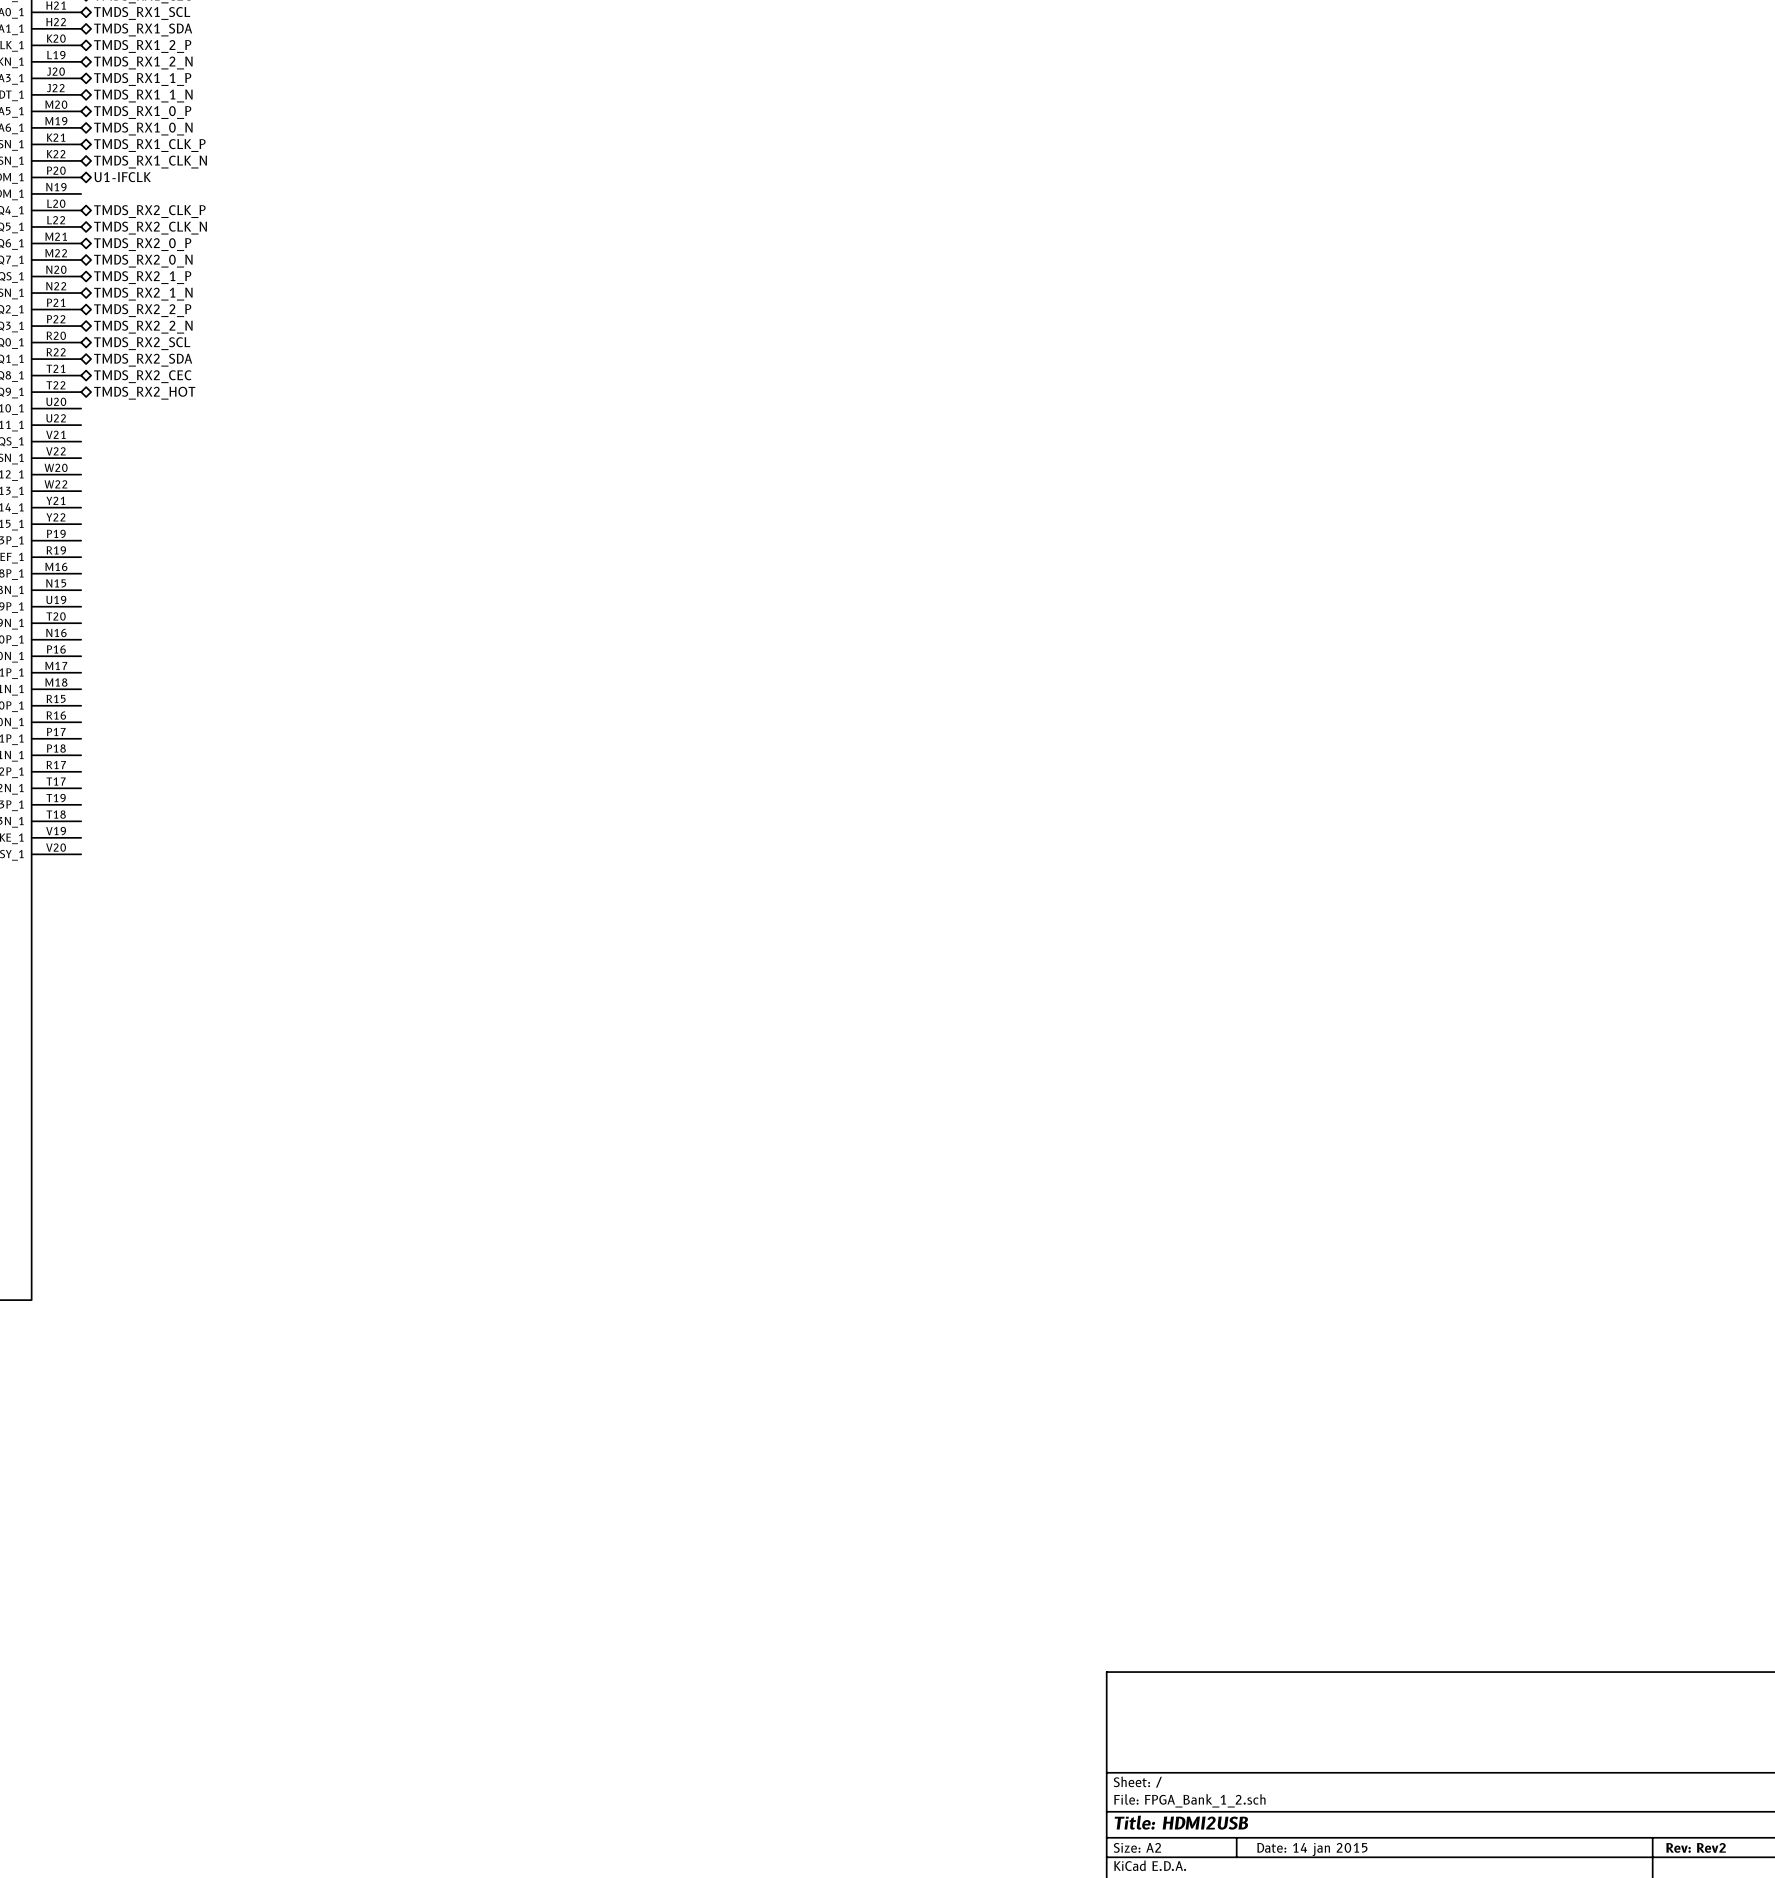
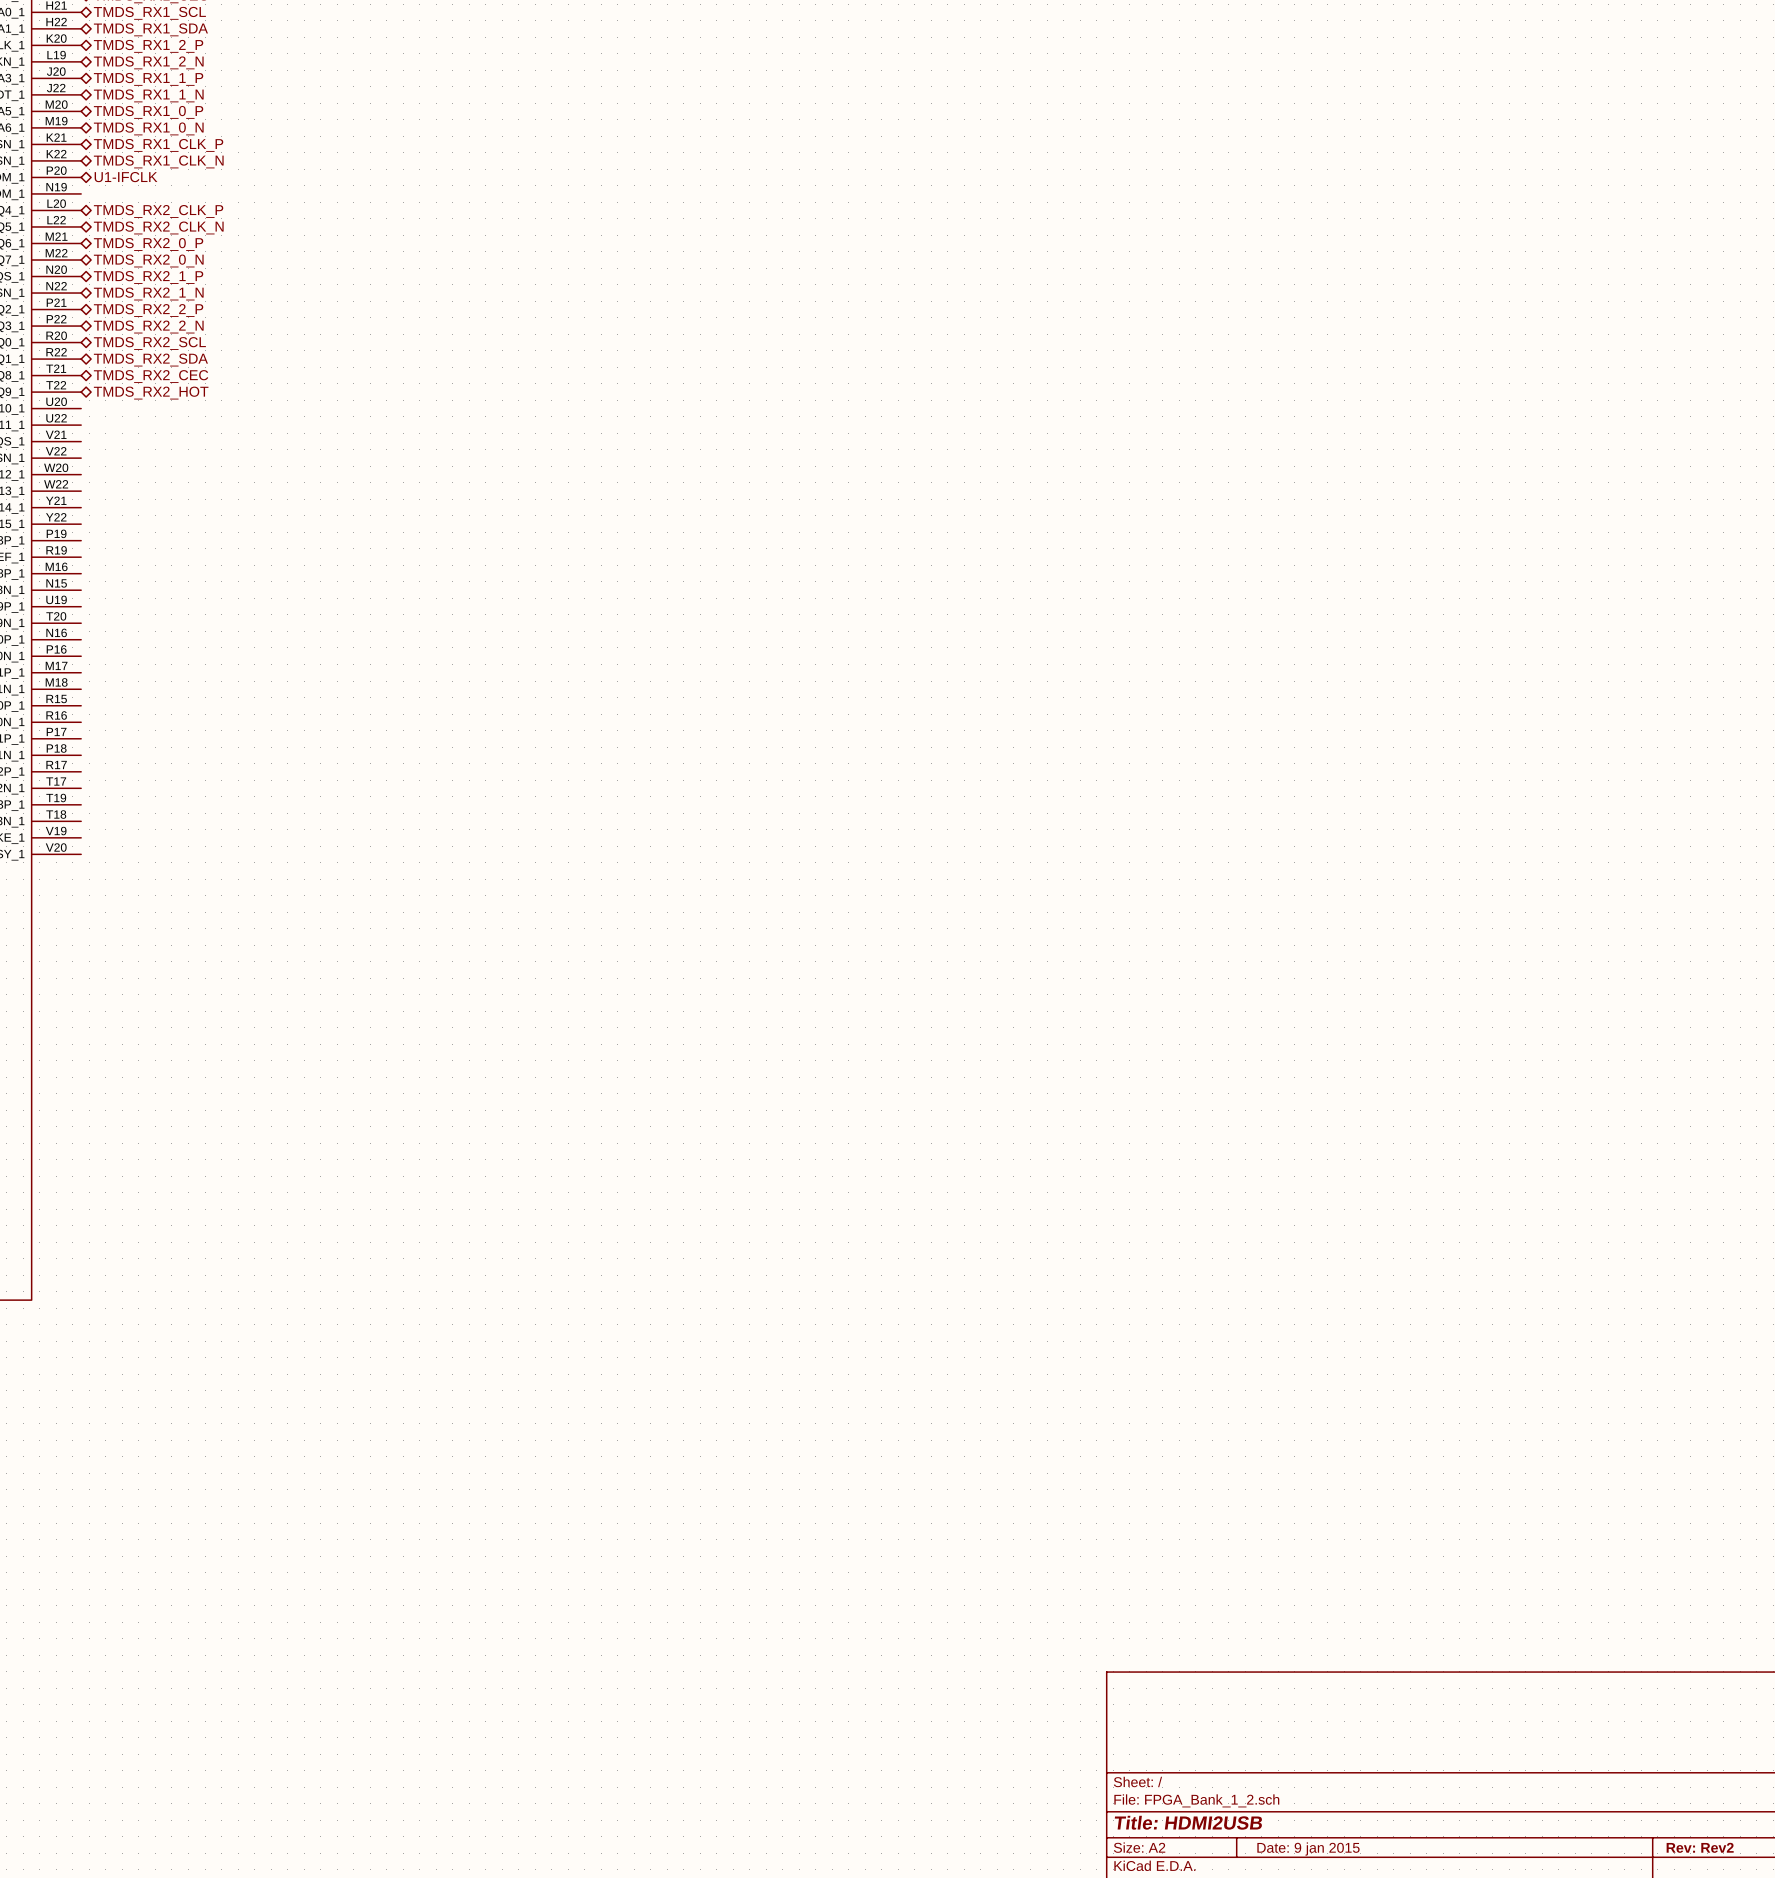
title block: Date: 14 jan 2015 (1312, 1849) -> Date: 9 jan 2015 (1308, 1849)

